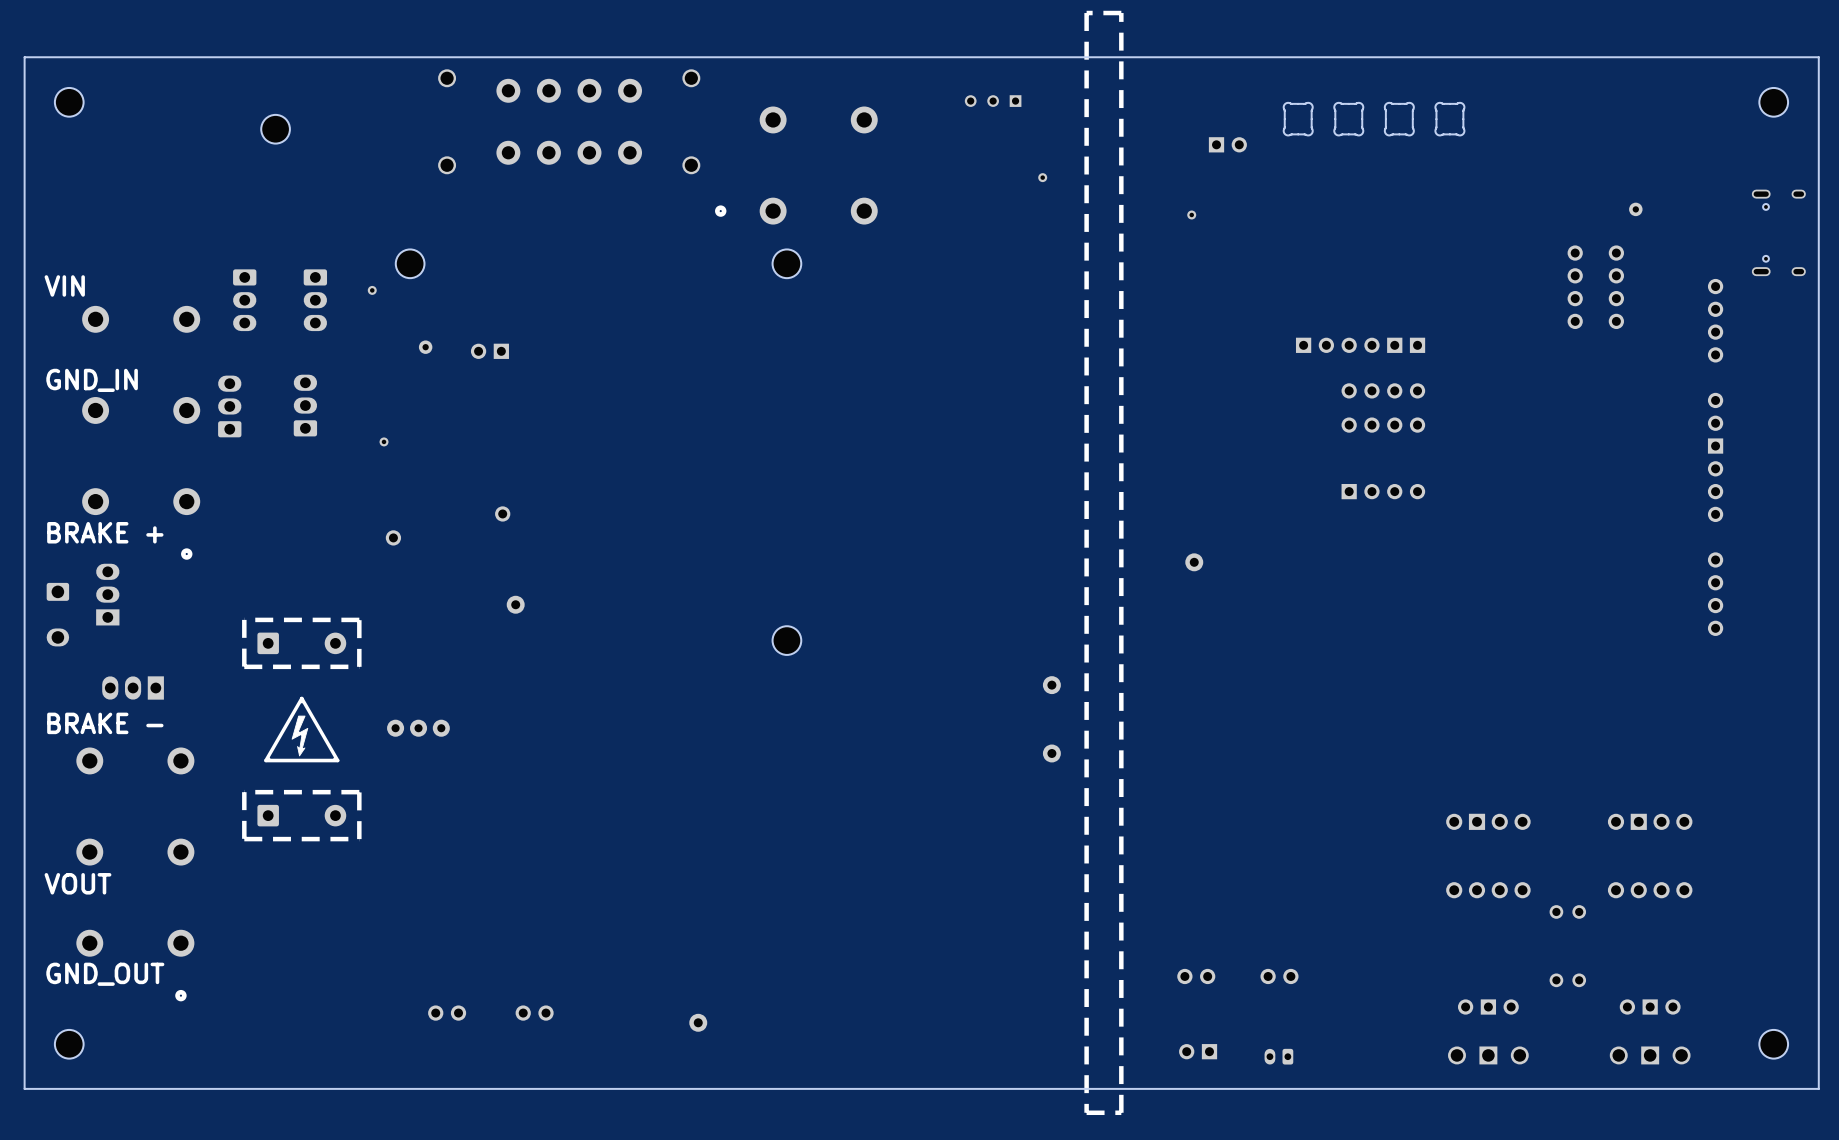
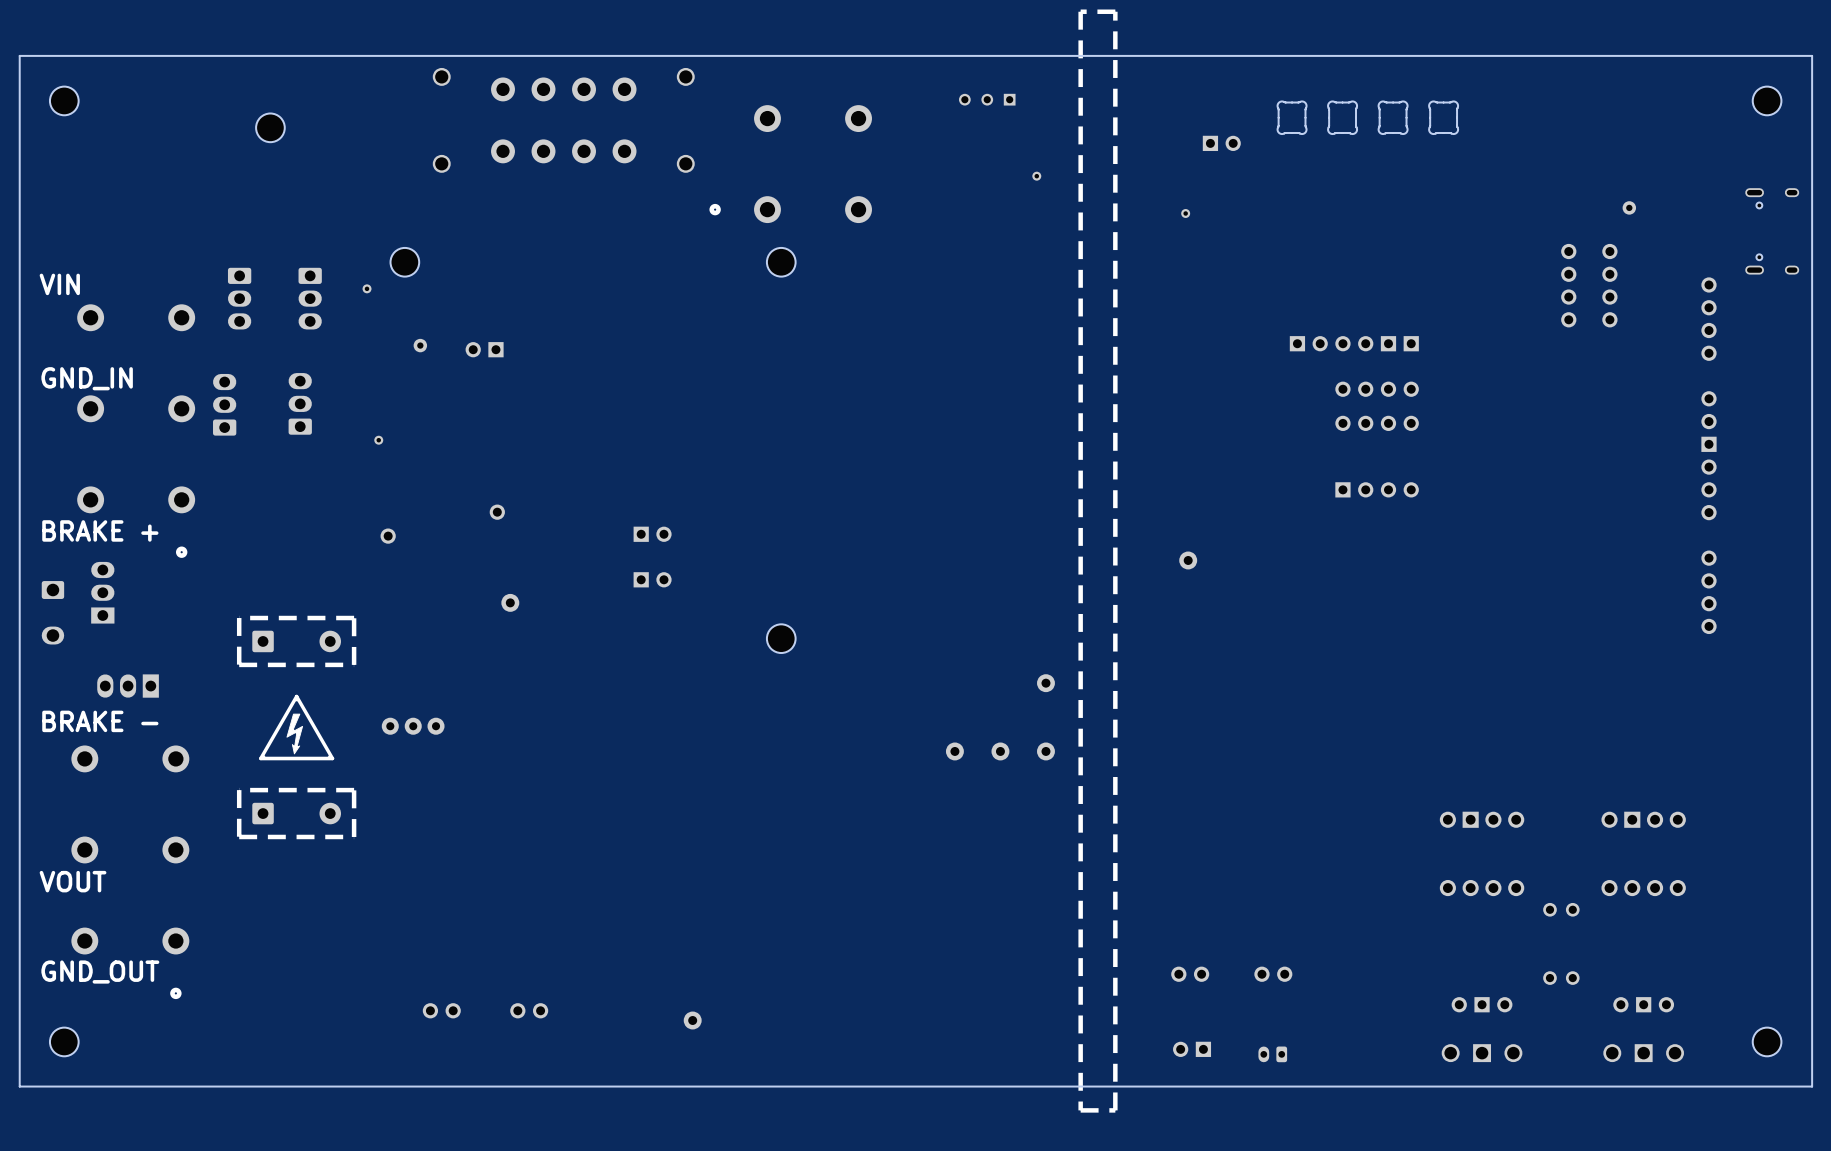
part: none -> (652, 534)
part: none -> (652, 579)
part: none -> (954, 751)
part: none -> (1000, 751)

